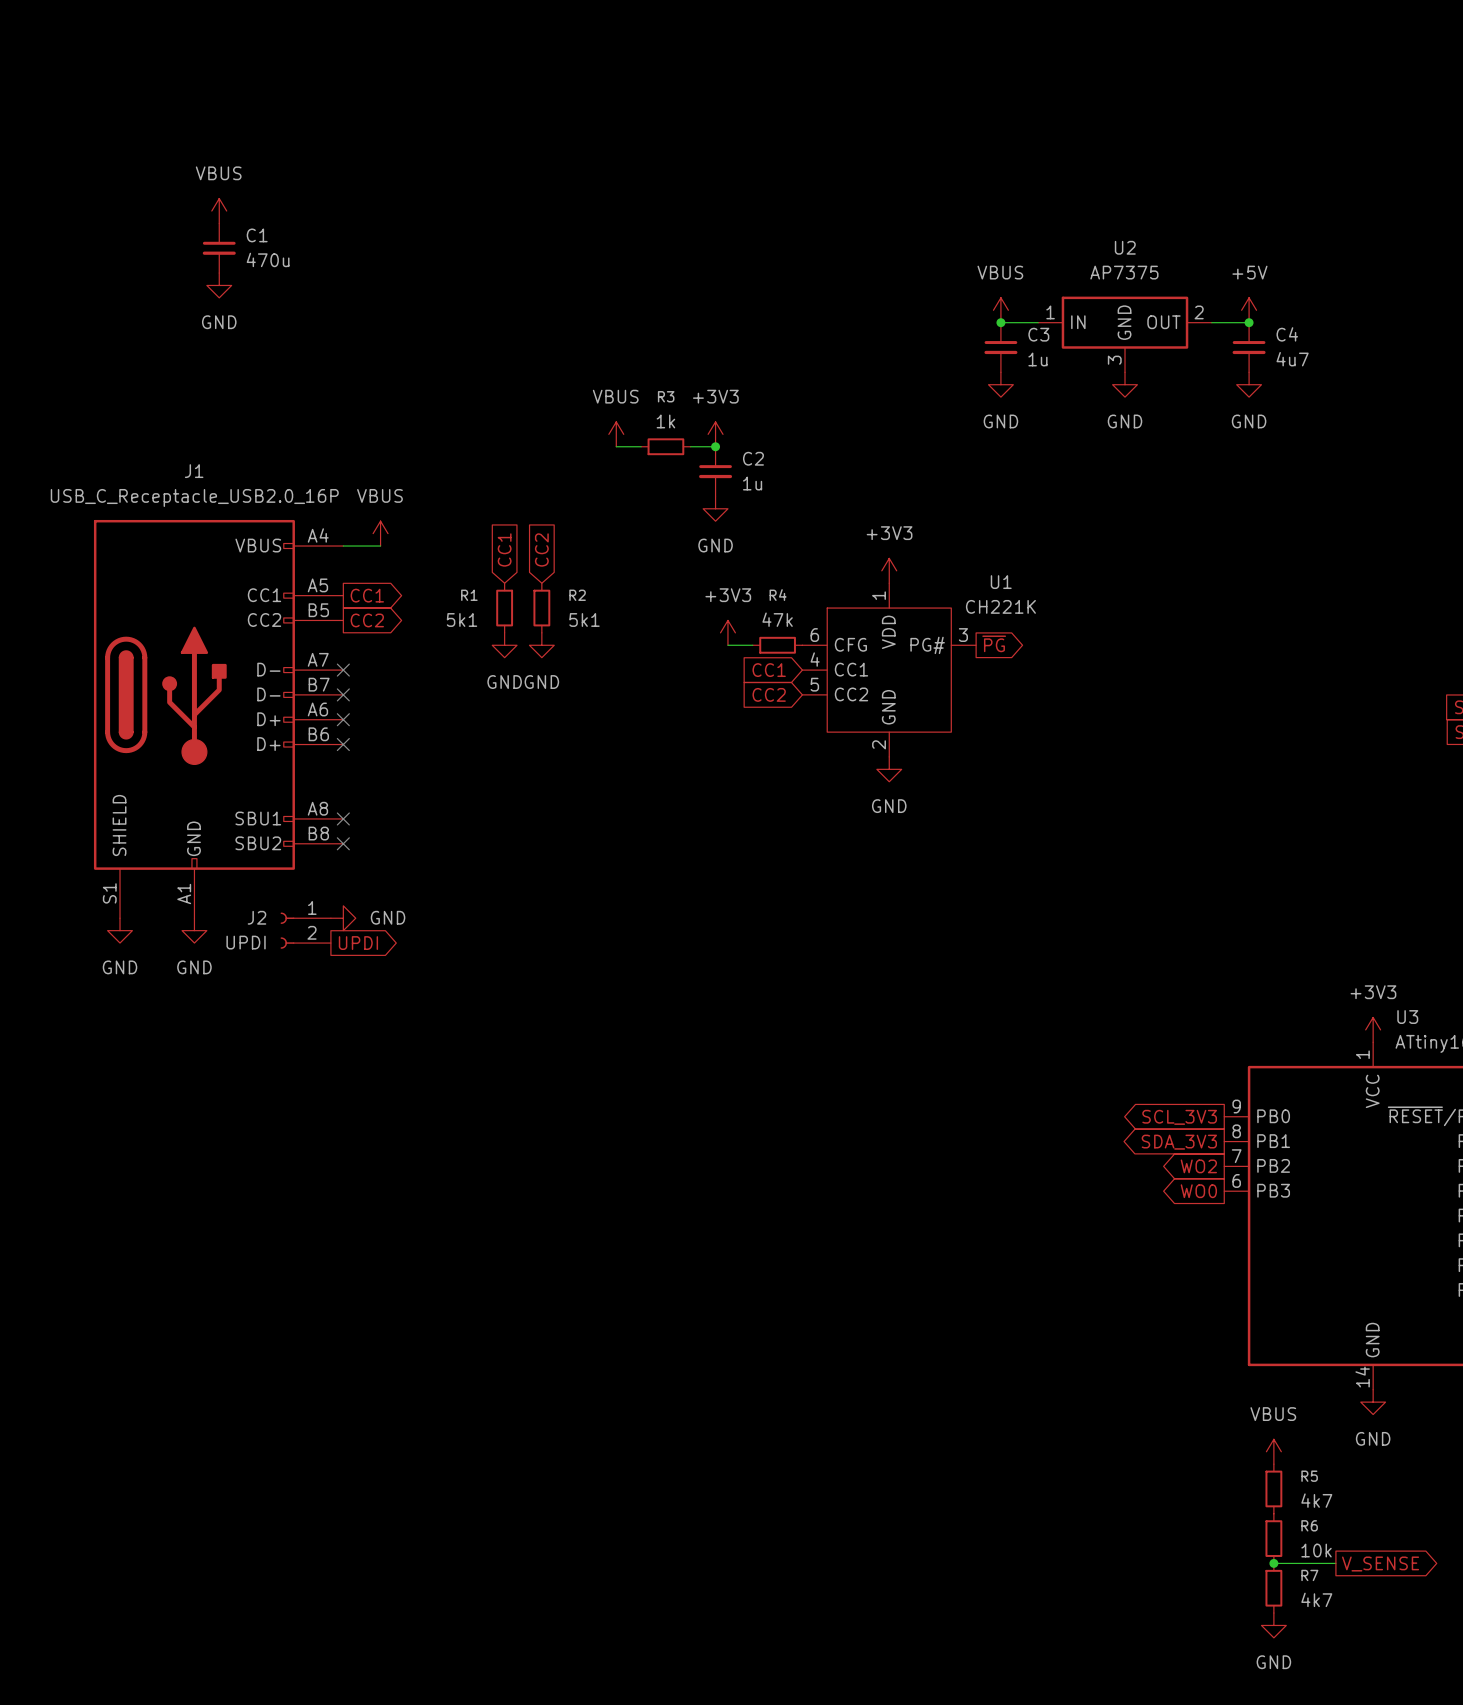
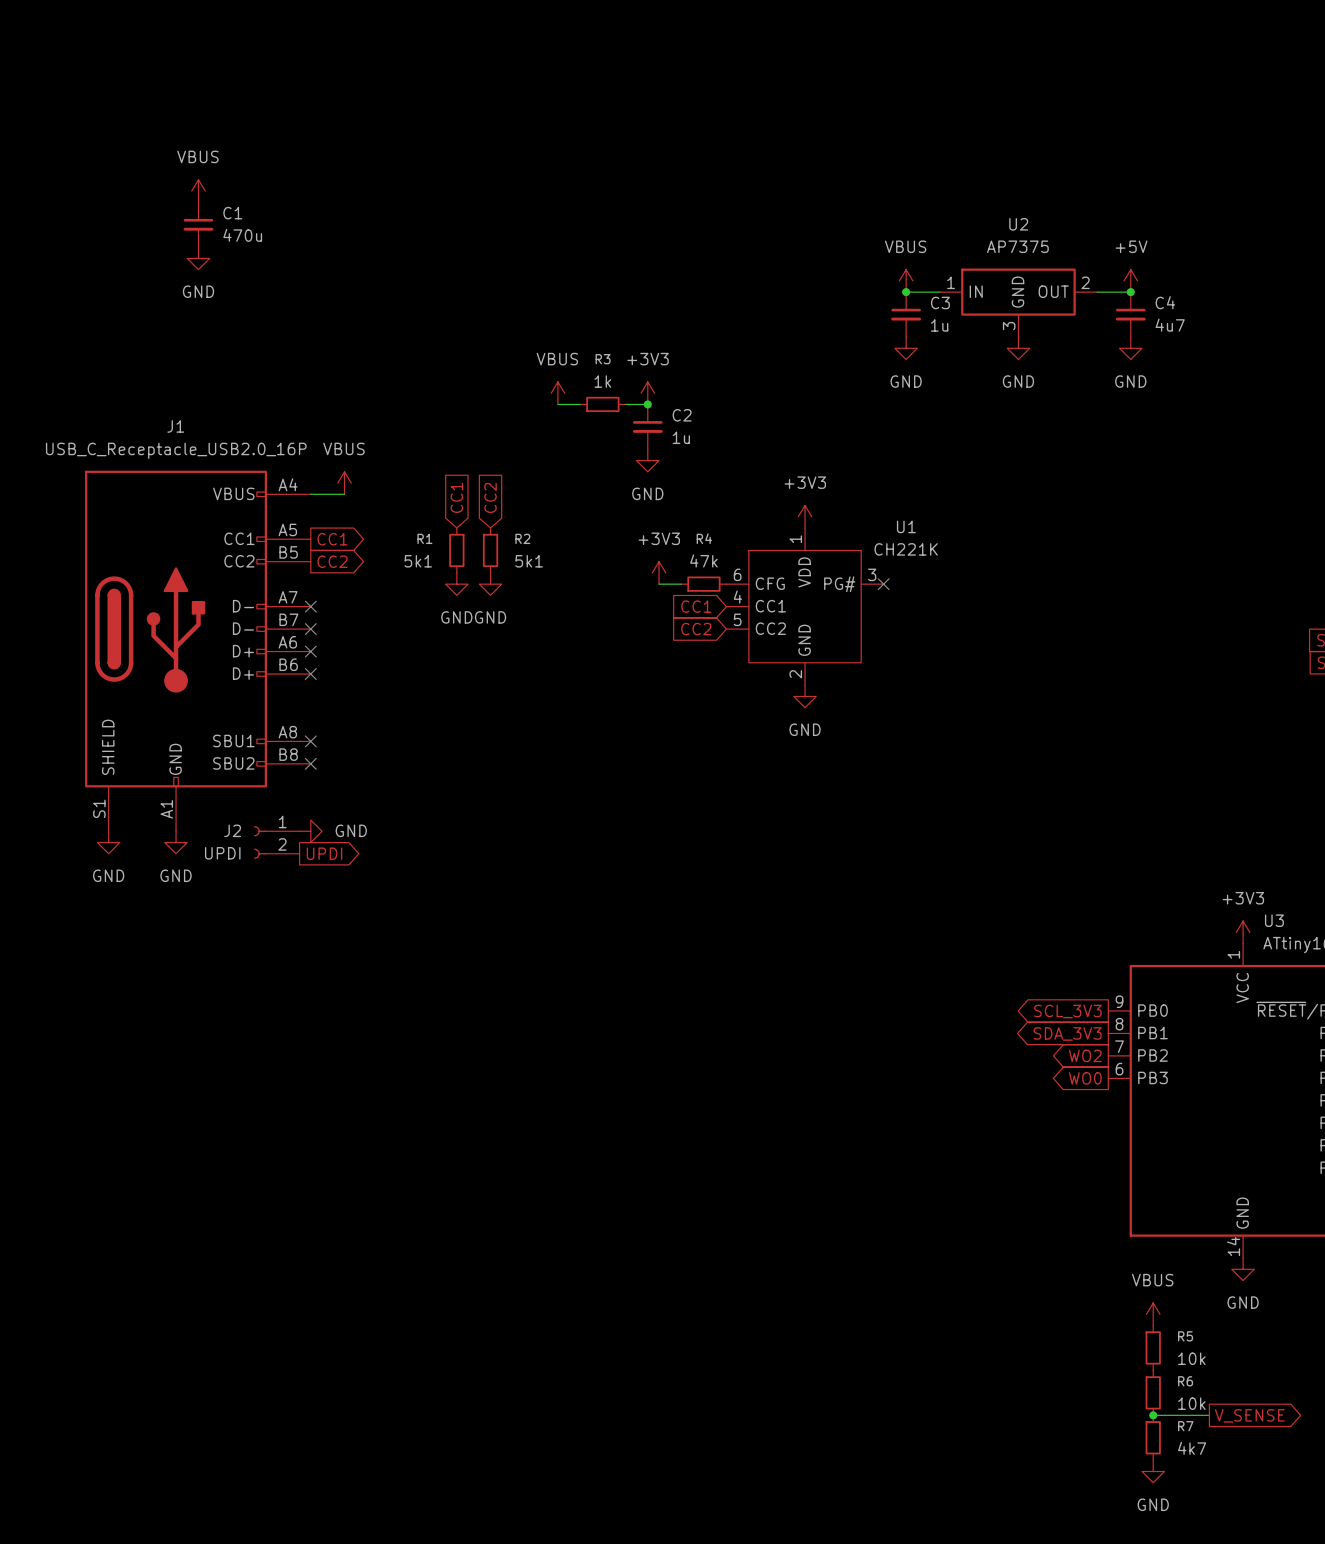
global label: ~{PG} (994, 643) -> none
no-connect mark: none -> (883, 584)
R5 value: 4k7 (1316, 1500) -> 10k (1191, 1358)

